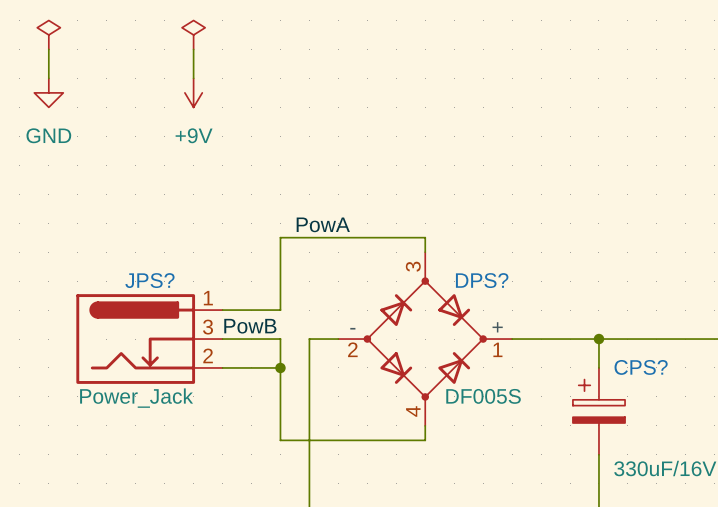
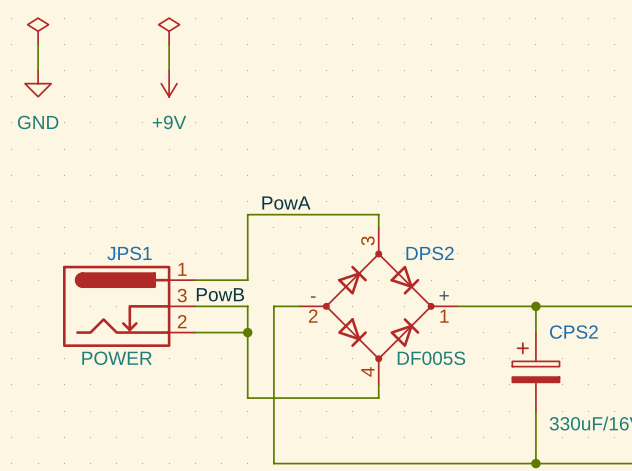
JPS? name: JPS? (149, 280) -> JPS1 (129, 253)
DPS? name: DPS? (482, 280) -> DPS2 (430, 253)
CPS? name: CPS? (641, 367) -> CPS2 (573, 332)
JPS? value: Power_Jack (136, 398) -> POWER (117, 358)

